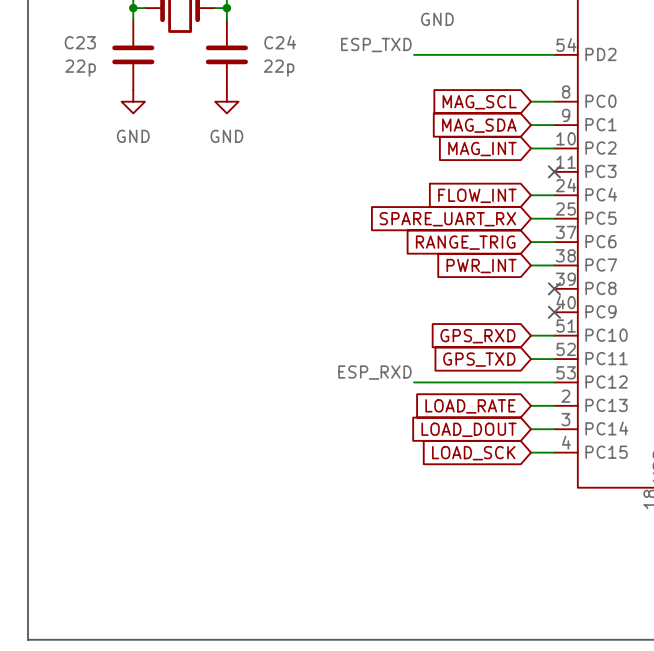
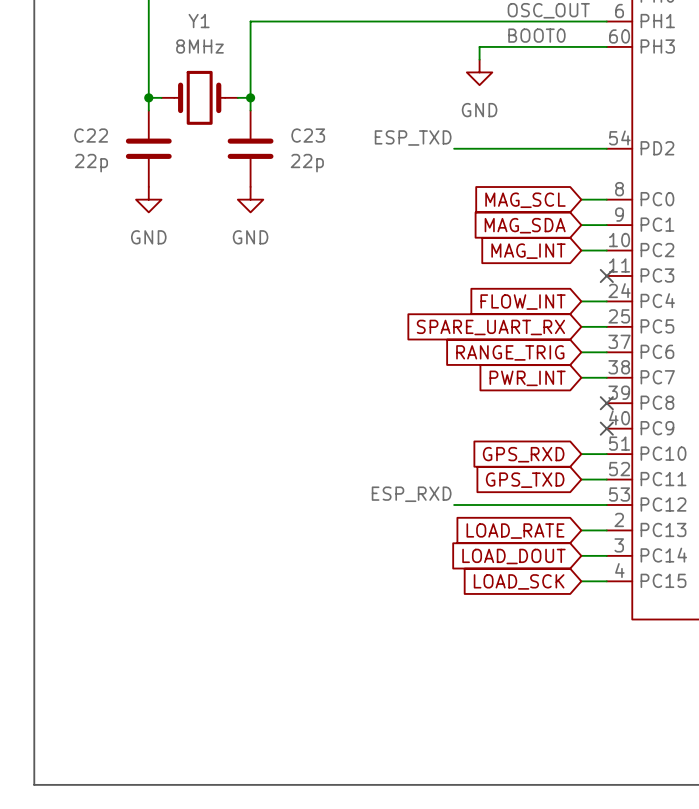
C23 name: C23 (80, 42) -> C22 (91, 135)
C24 name: C24 (280, 42) -> C23 (308, 135)

